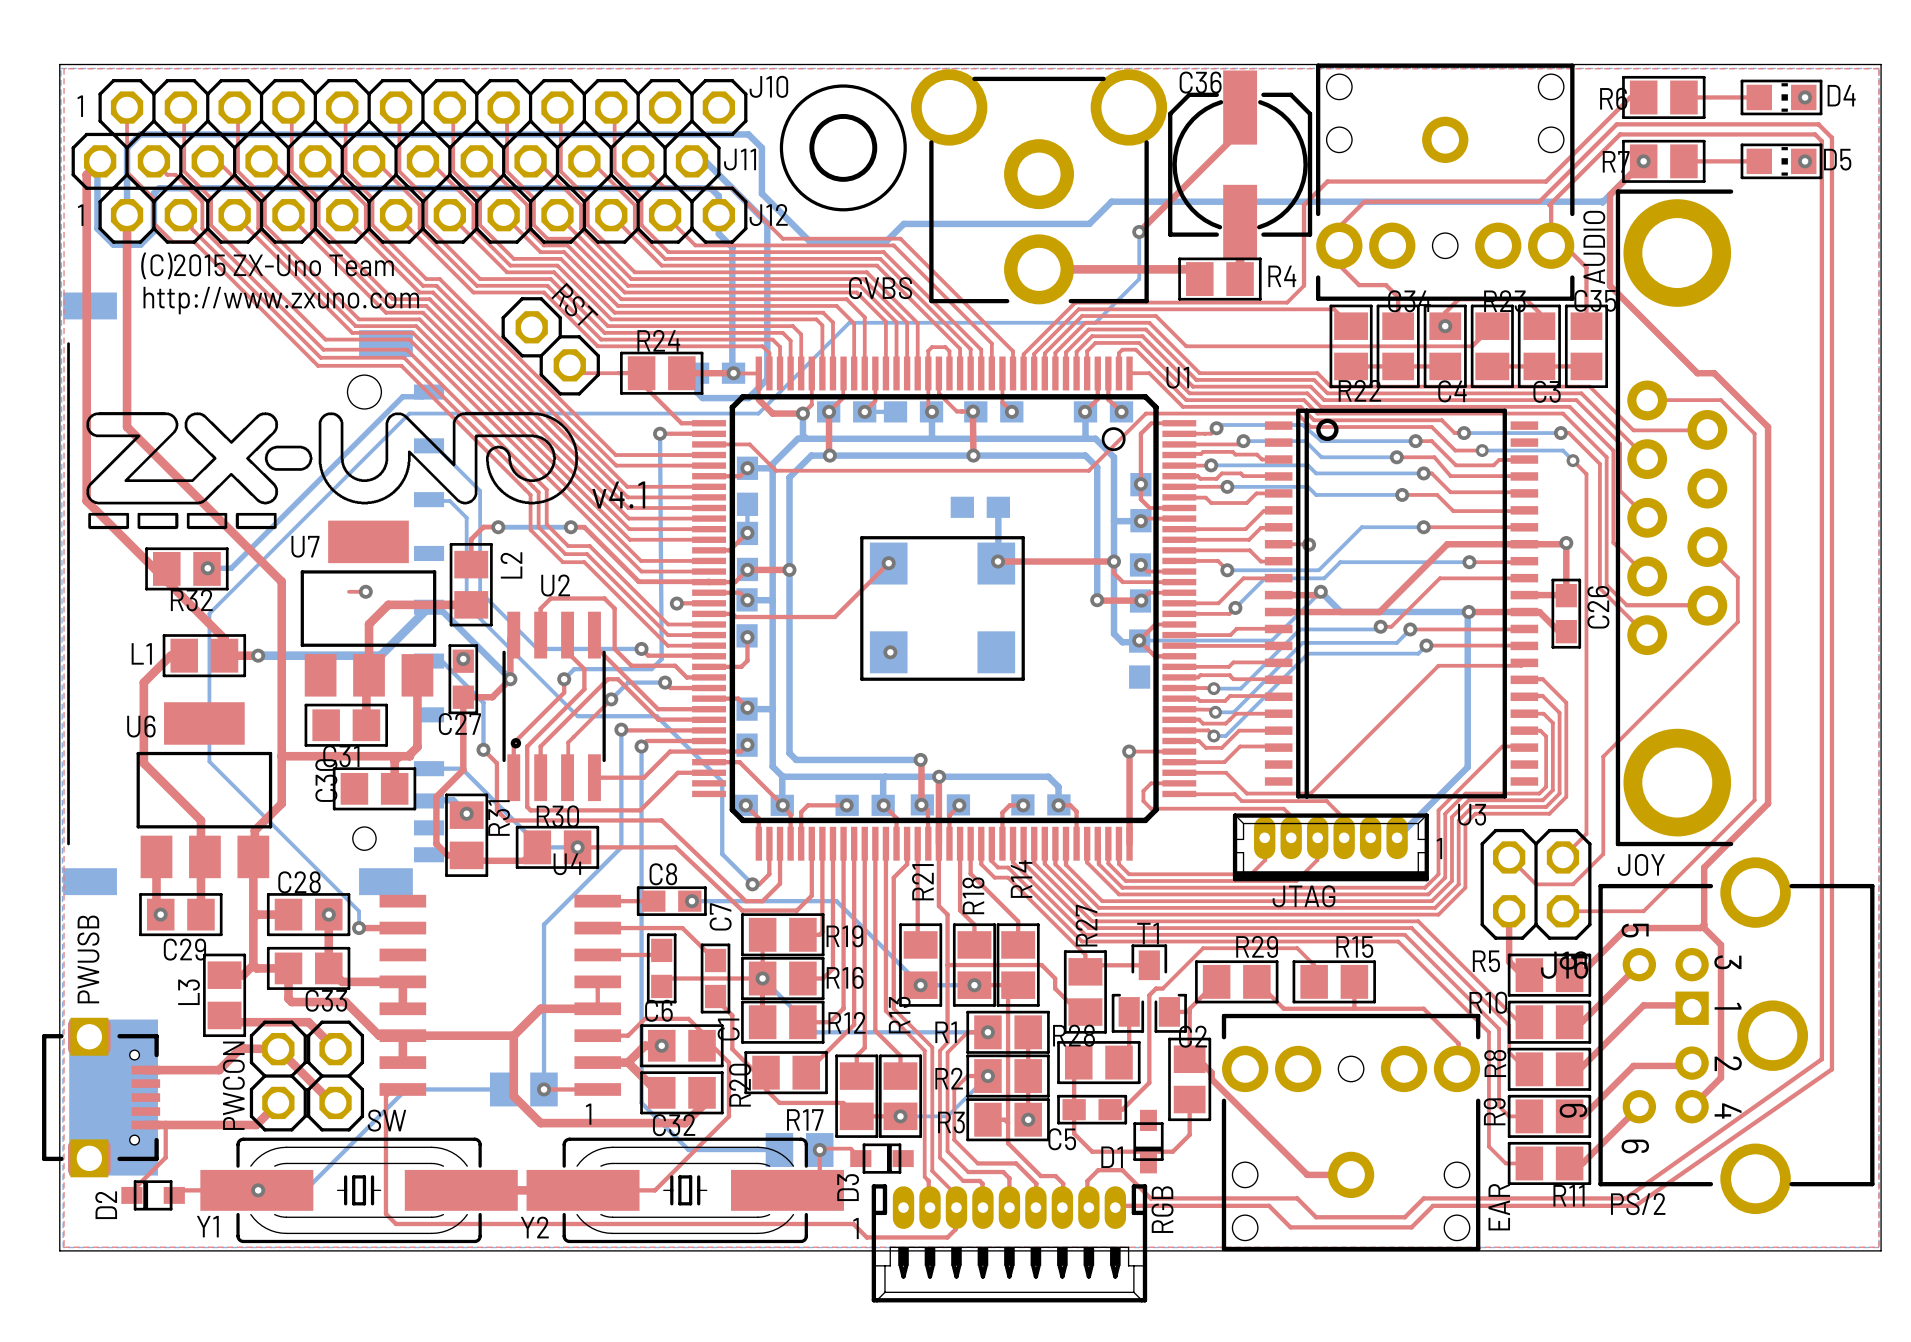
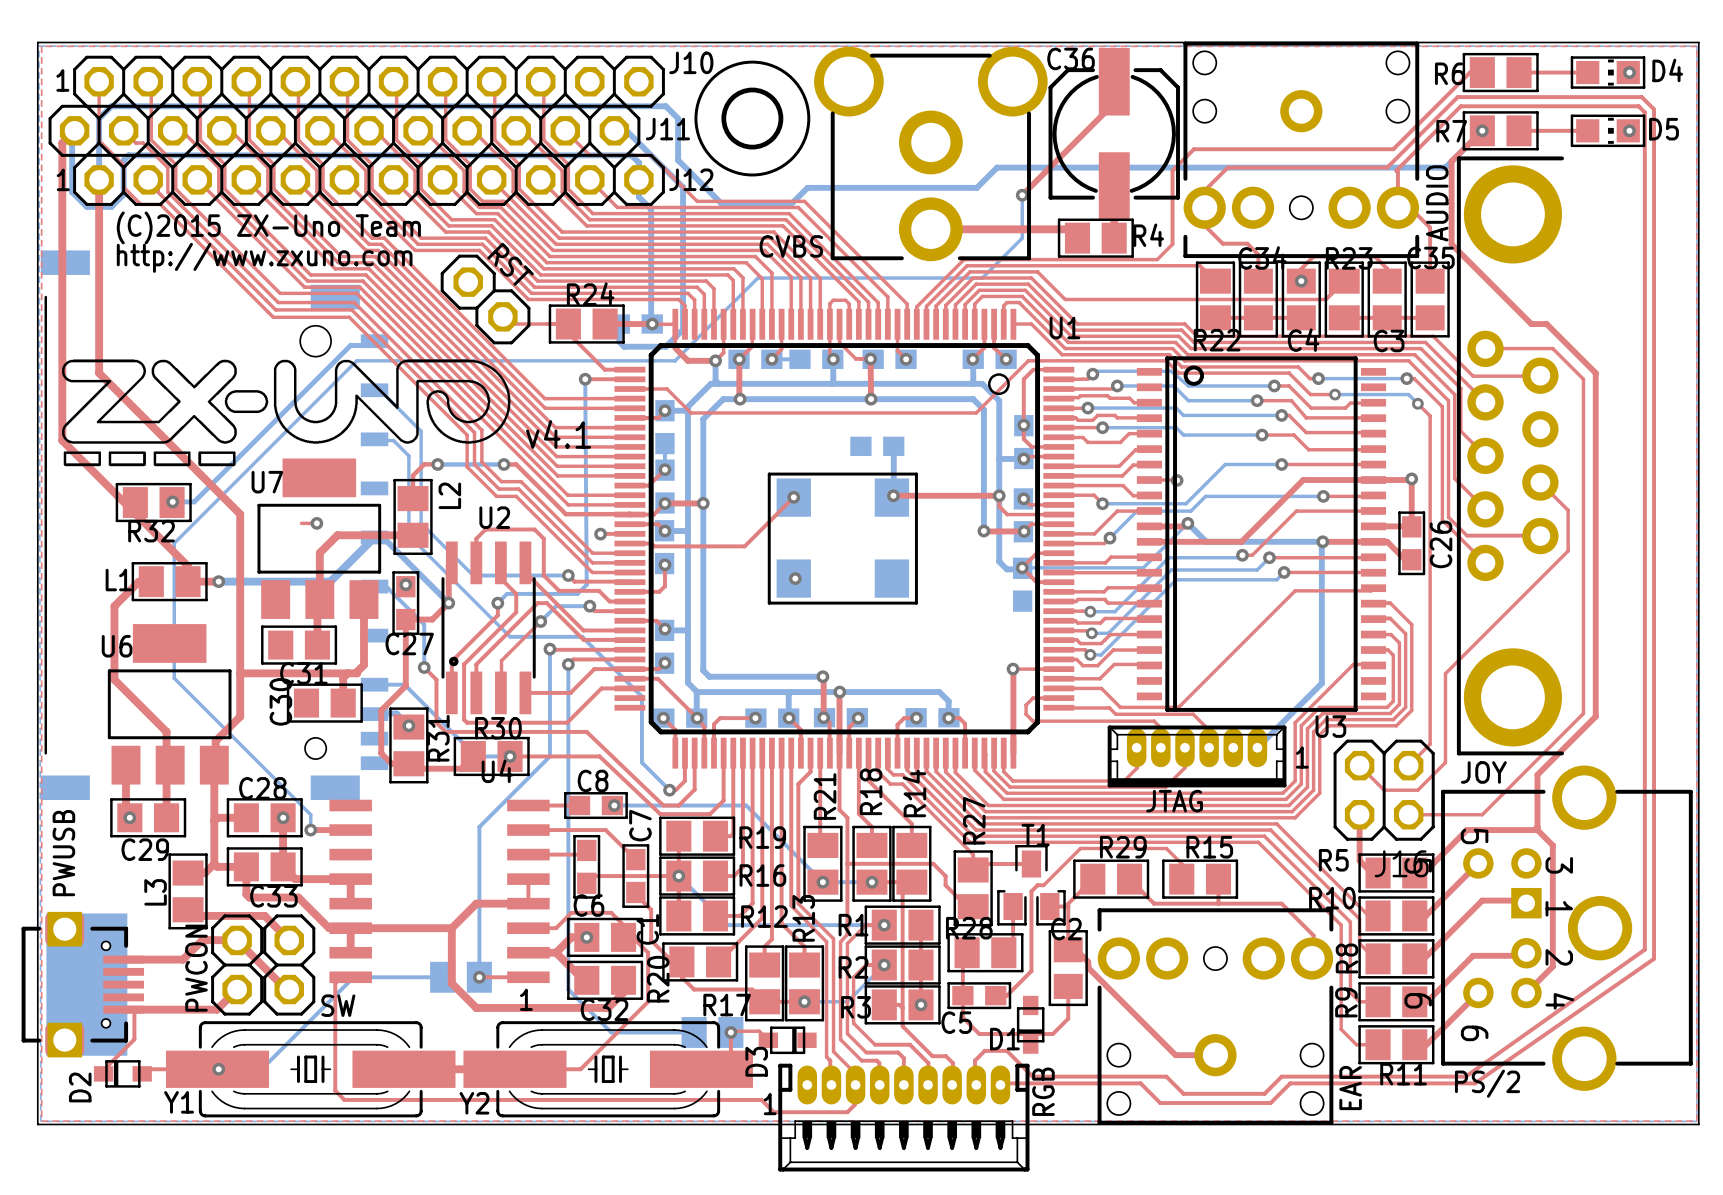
PWUSB footprint: [42, 1017, 161, 1178] -> [21, 911, 145, 1058]

